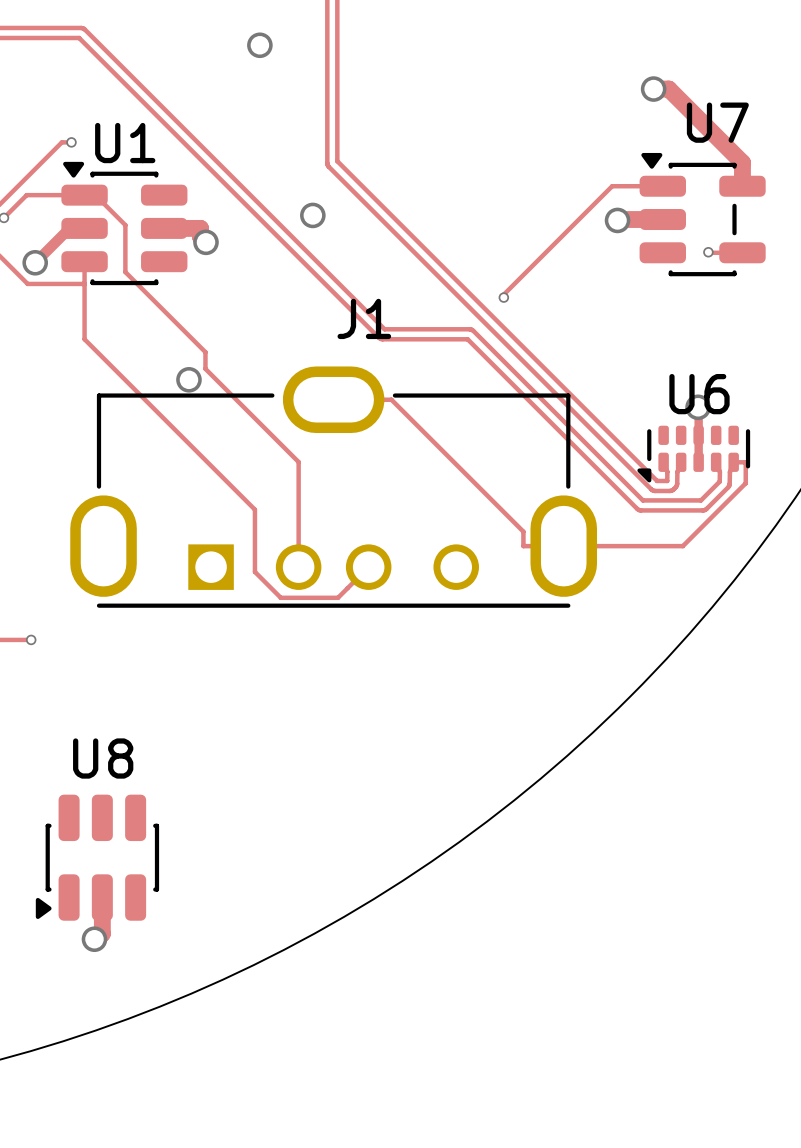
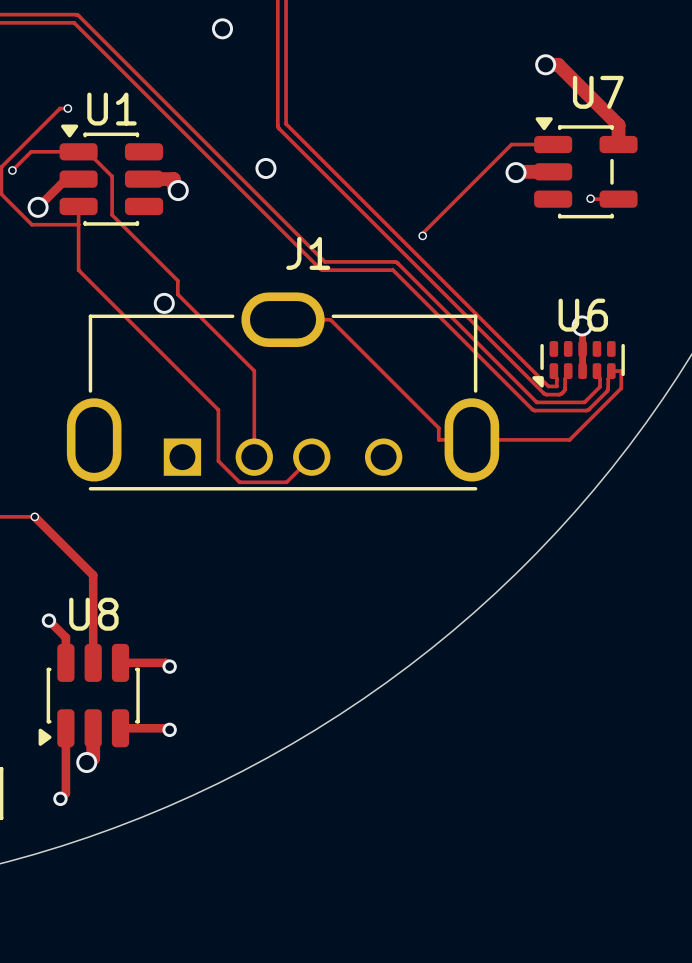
track: none -> (34, 516) (93, 575) (93, 662)
track: none -> (48, 620) (65, 637) (65, 662)
via: none -> (48, 620)
track: none -> (120, 662) (165, 662) (169, 666)
via: none -> (169, 666)
track: none -> (65, 728) (65, 793) (60, 798)
track: none -> (120, 728) (168, 728) (169, 729)
via: none -> (169, 729)
via: none -> (60, 798)

